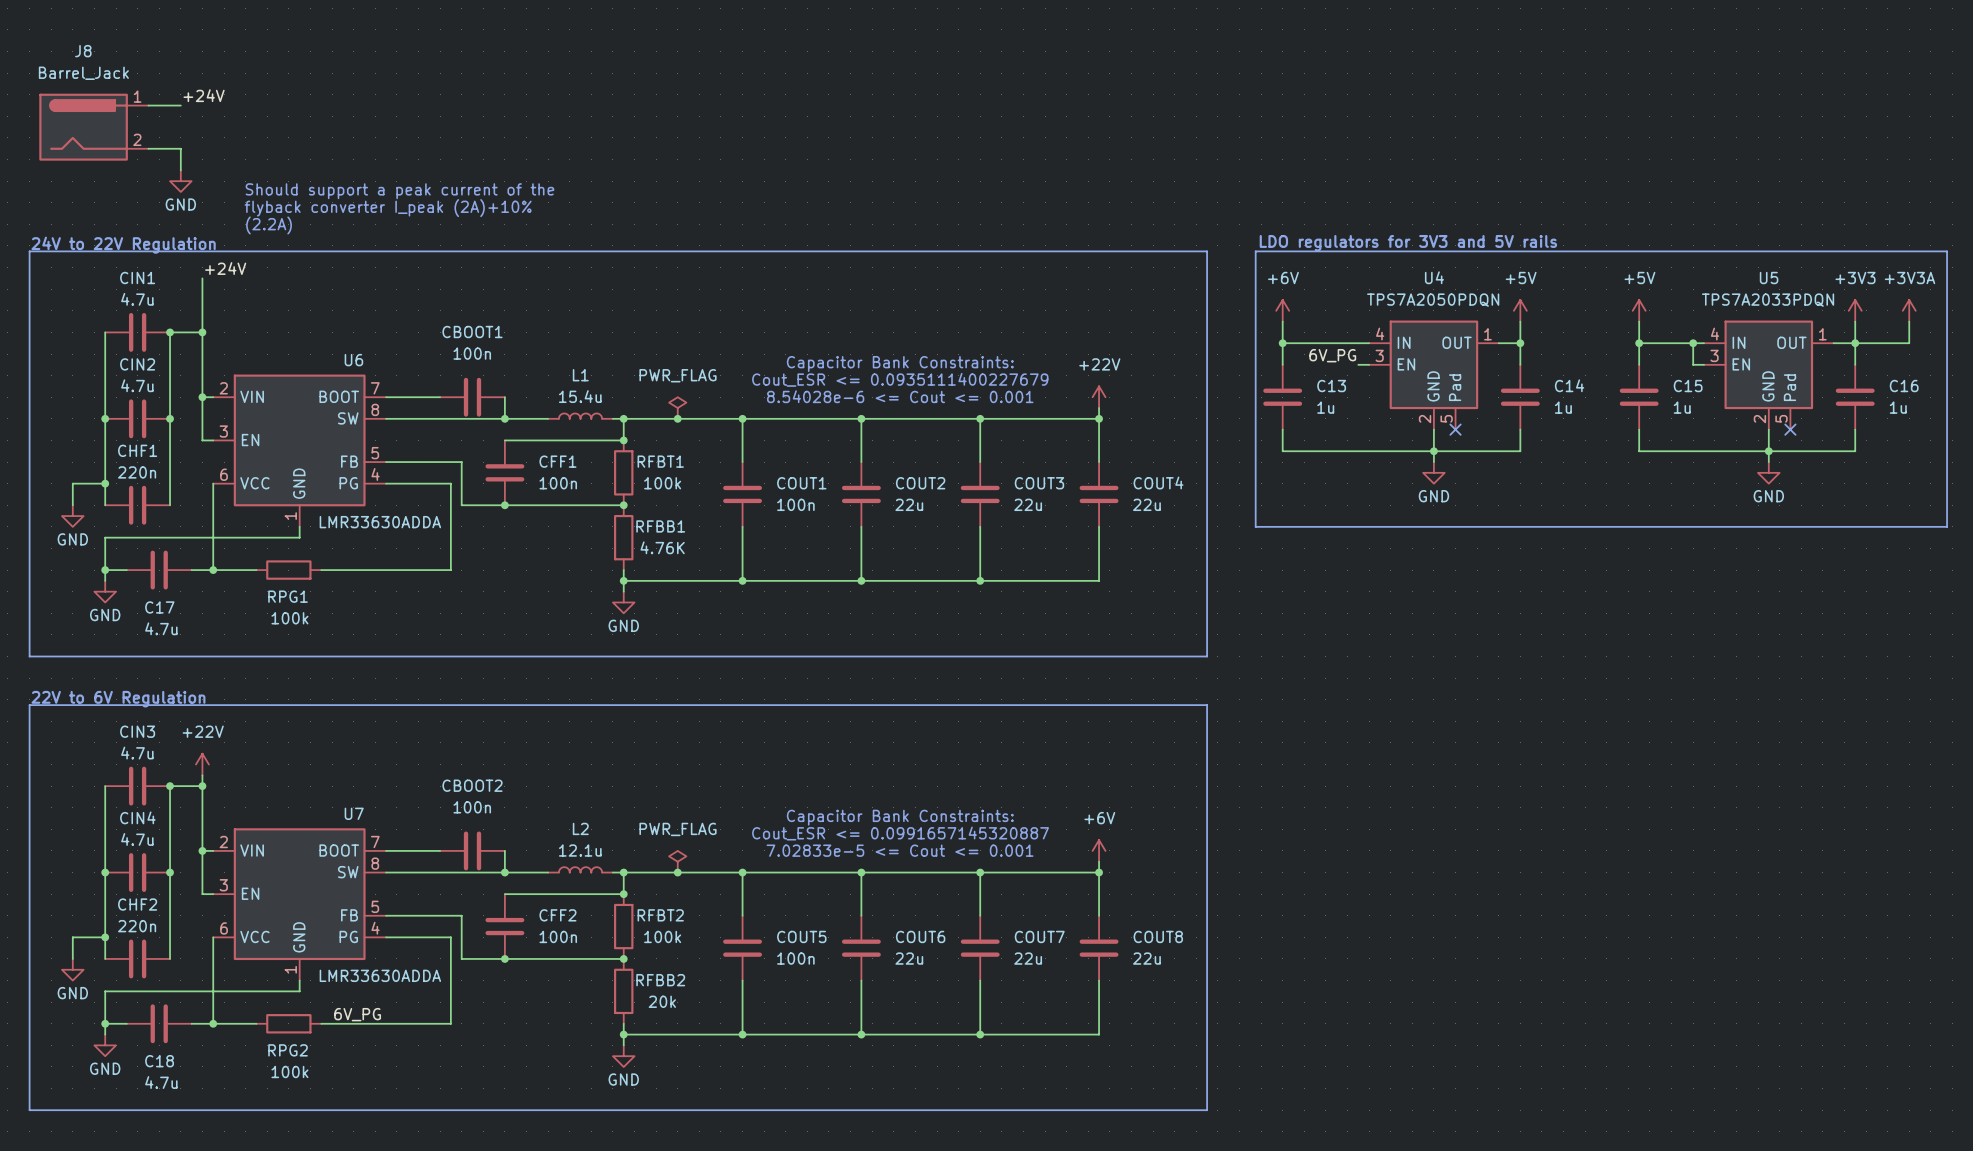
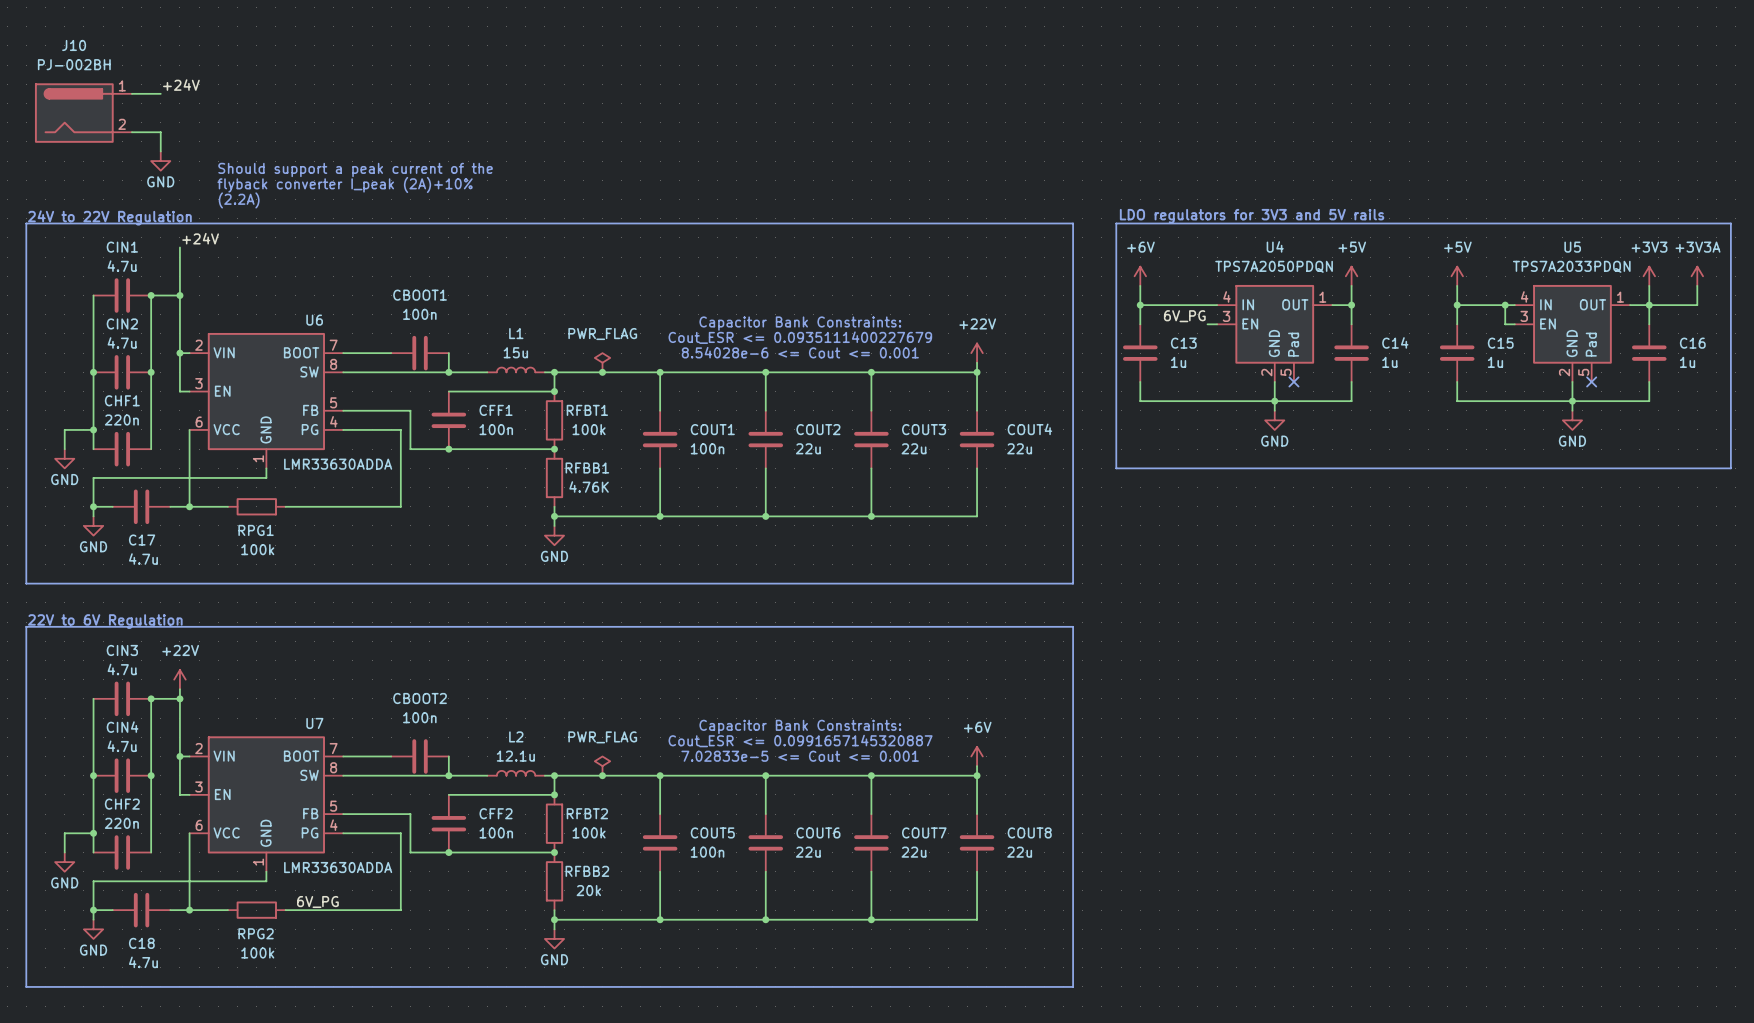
J8 name: J8 (83, 51) -> J10 (74, 45)
J8 value: Barrel_Jack (83, 73) -> PJ-002BH (74, 64)
L1 value: 15.4u (580, 396) -> 15u (515, 352)

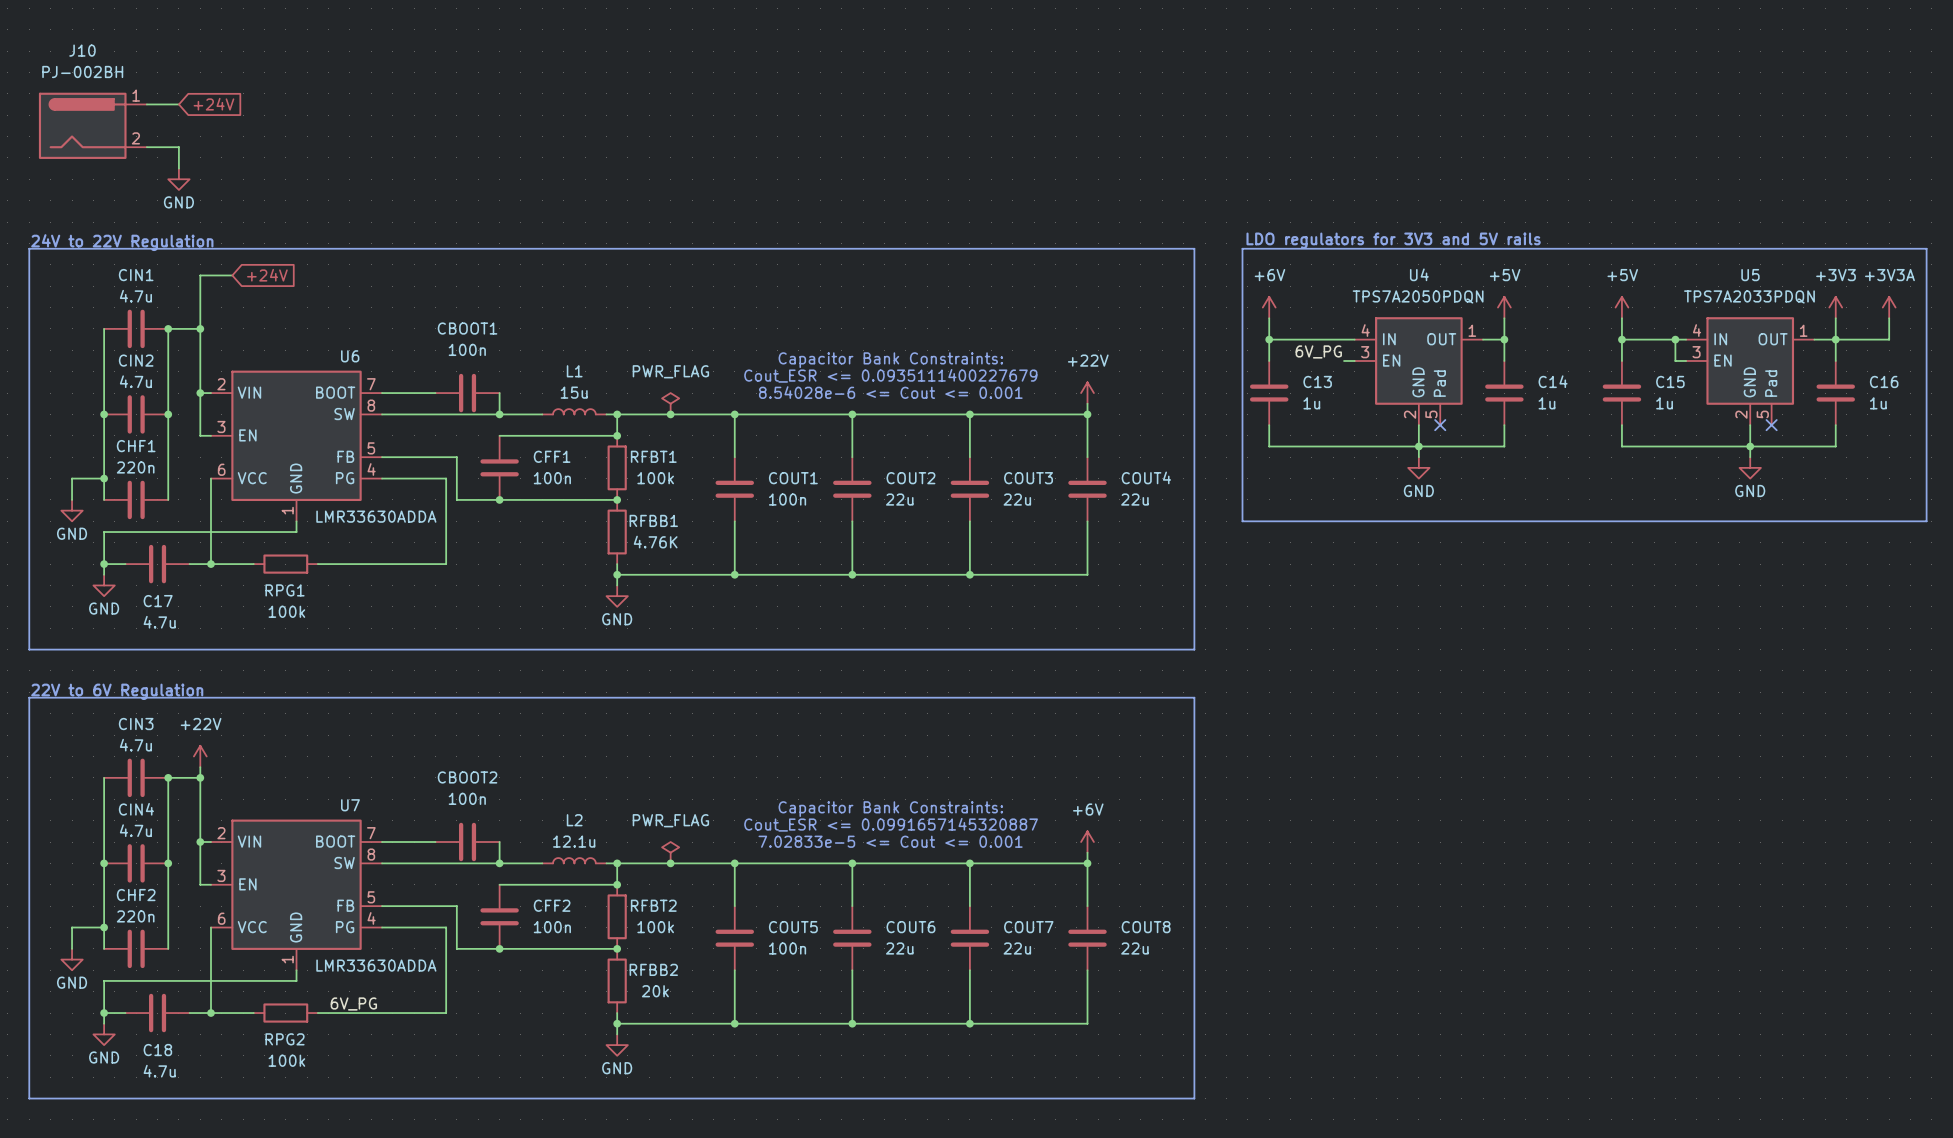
label: +24V (181, 85) -> none
global label: none -> +24V (213, 104)
text: Should support a peak current of the (355, 169) -> none
text: flyback converter I_peak (2A)+10% (345, 184) -> none
text: (2.2A) (239, 200) -> none
label: +24V (200, 238) -> none
wire: none -> (200, 275) (232, 275)
global label: none -> +24V (267, 275)

